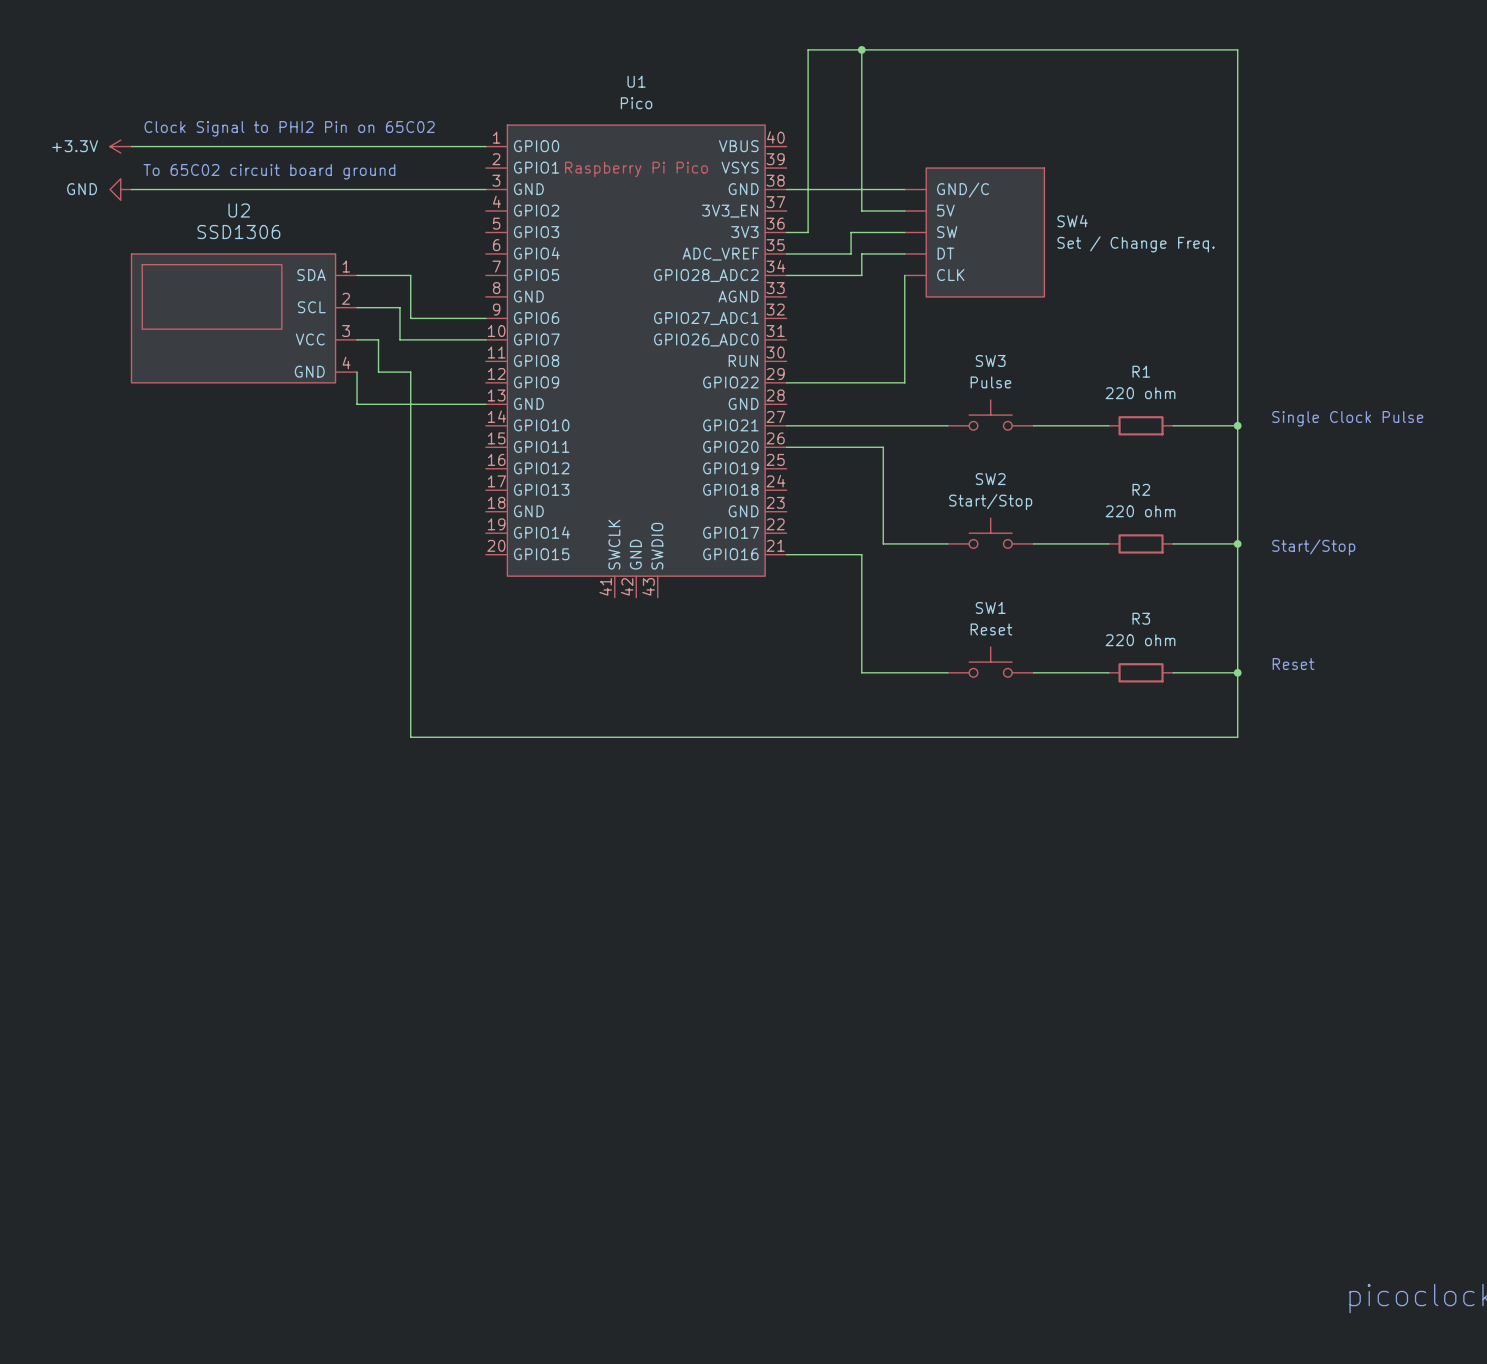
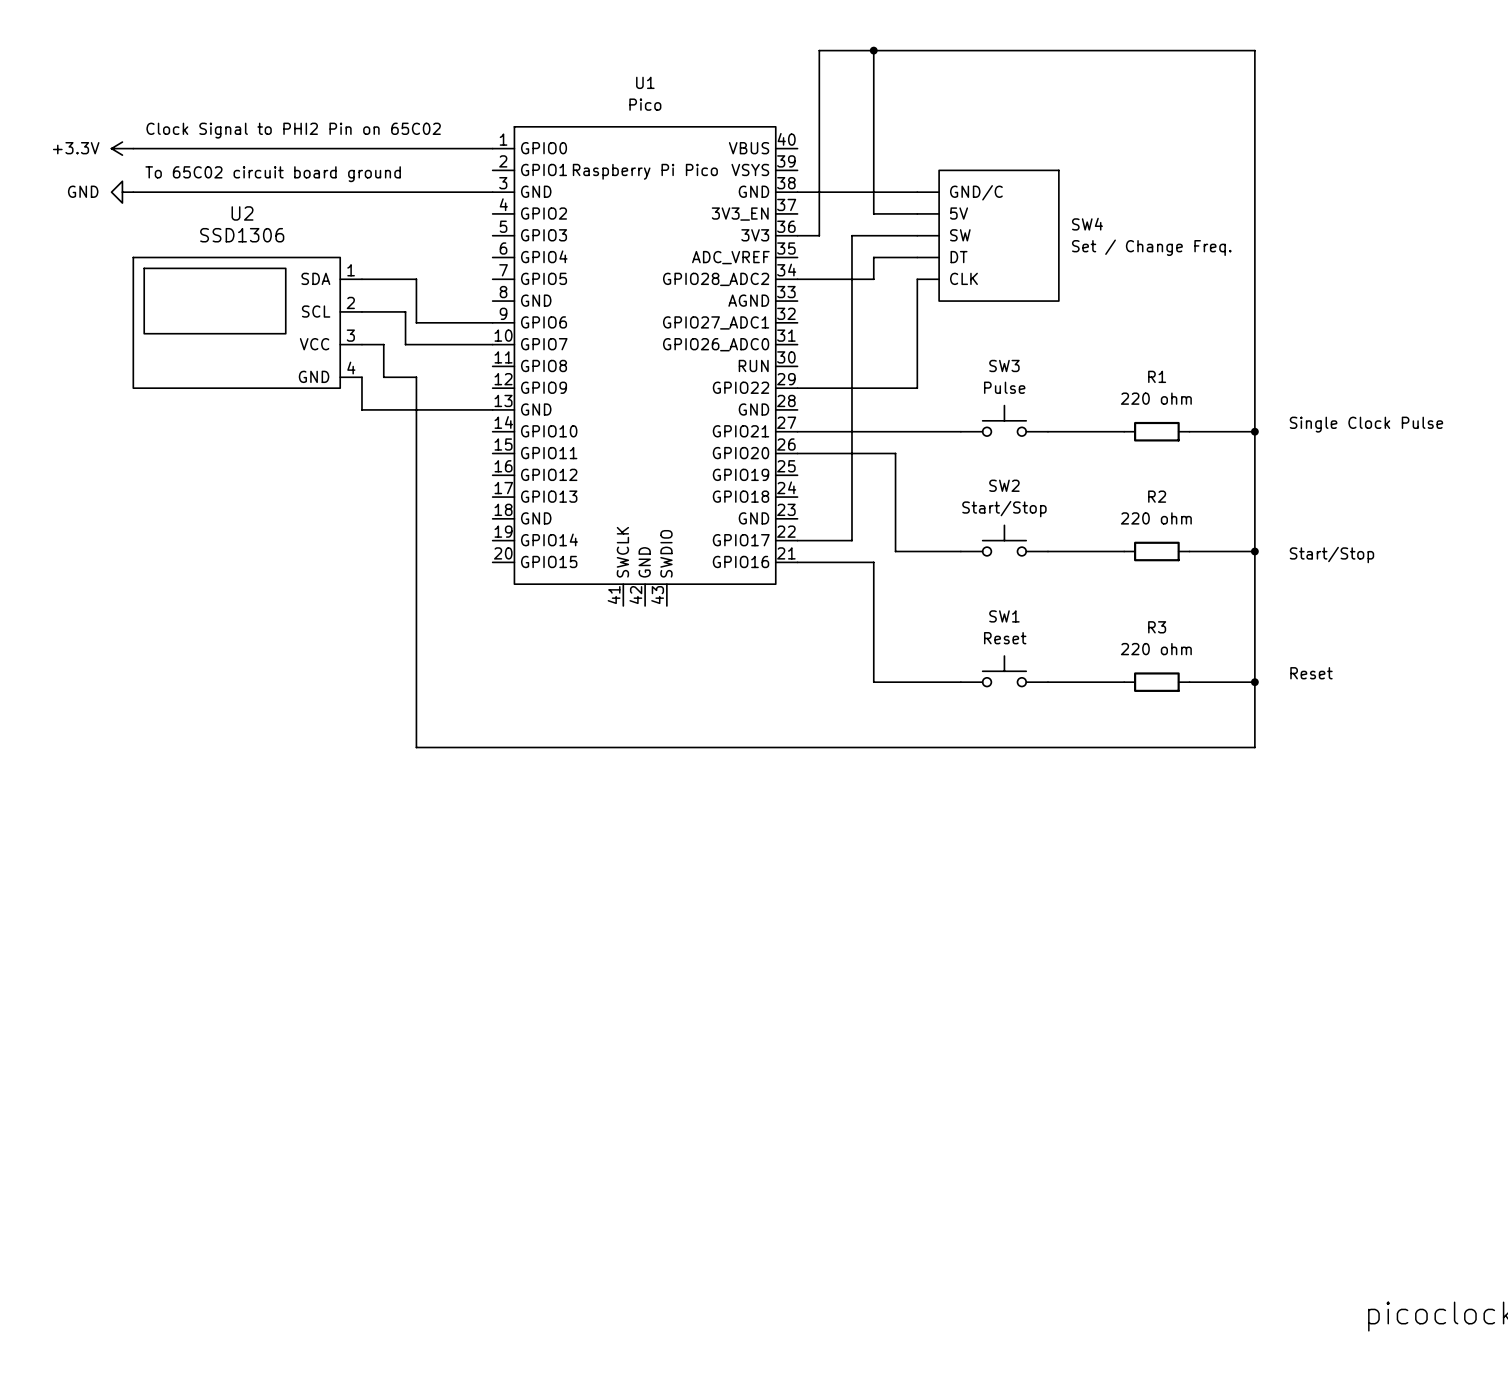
wire: (851, 232) (851, 253) (786, 253) -> (862, 235) (851, 235) (851, 540) (797, 540)

